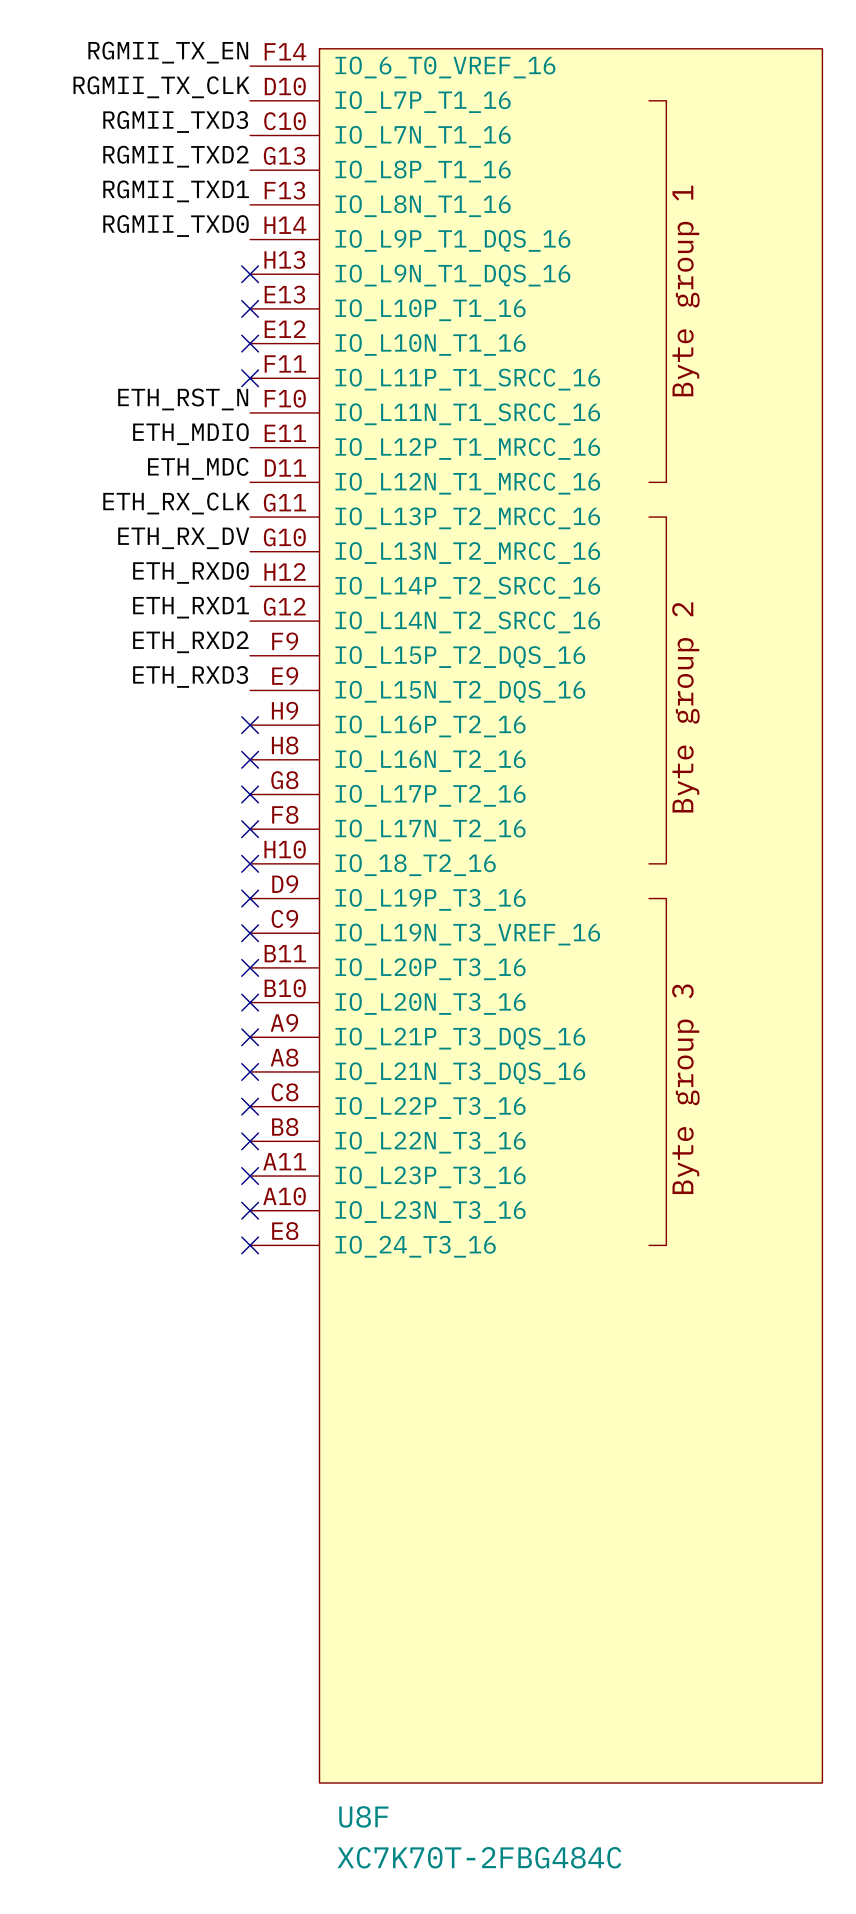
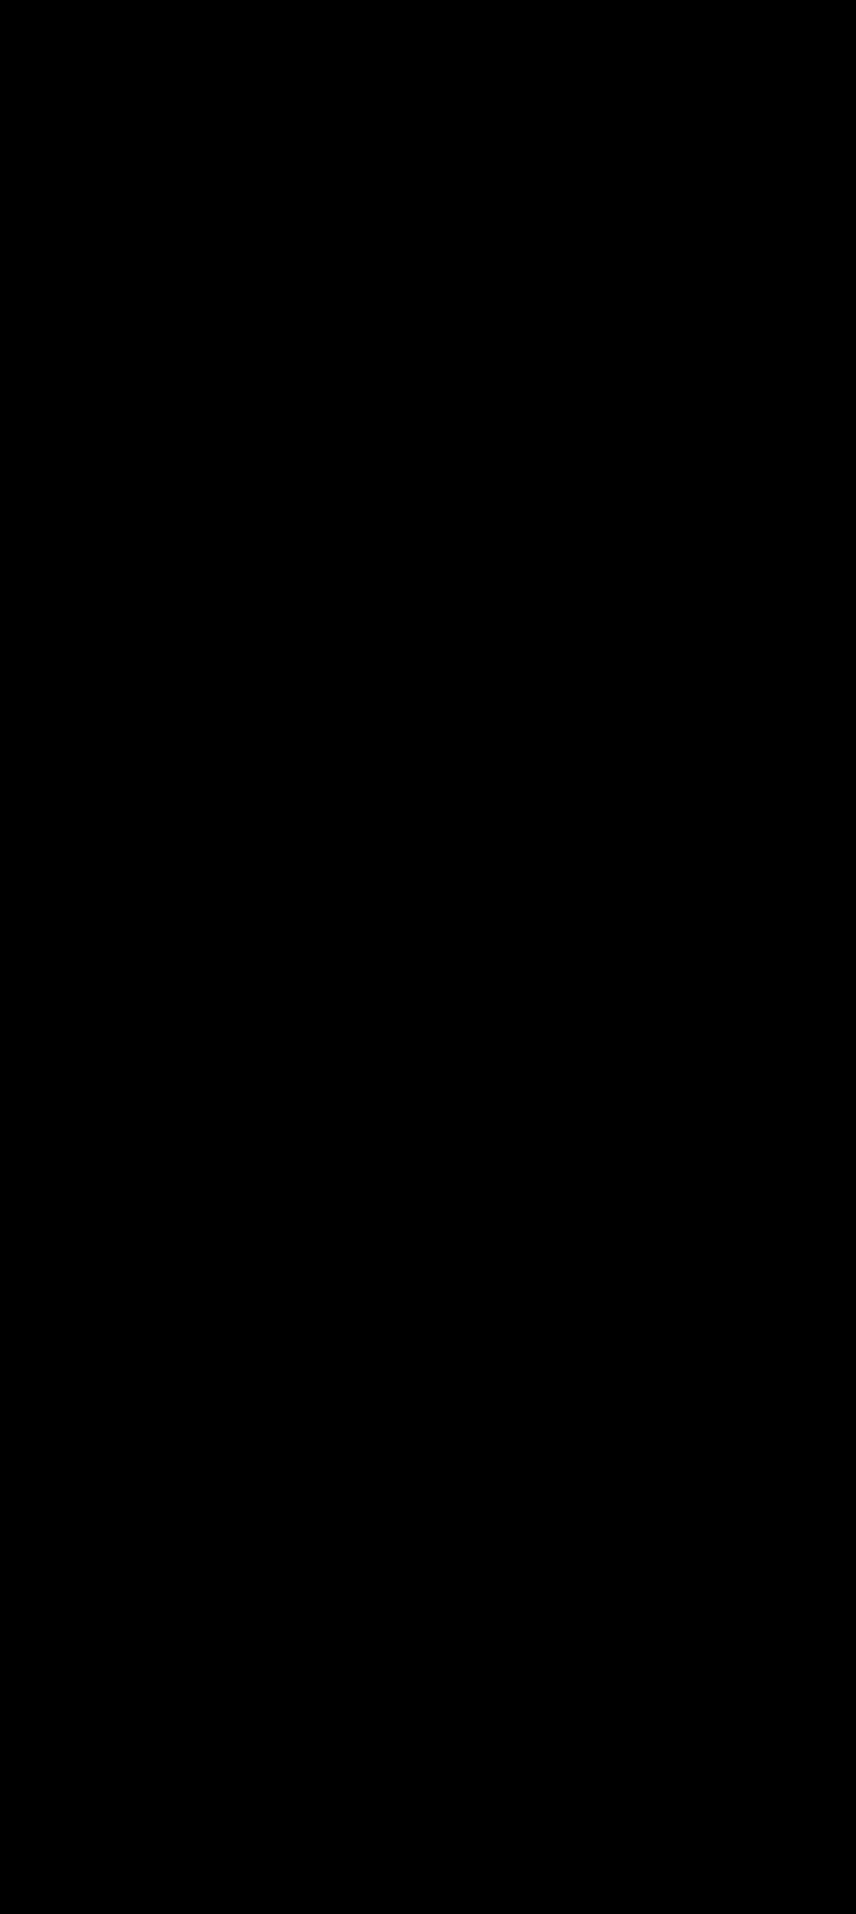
label: RGMII_TX_EN (168, 52) -> none
label: RGMII_TX_CLK (161, 87) -> none
label: RGMII_TXD3 (175, 121) -> none
label: RGMII_TXD2 (175, 156) -> none
label: RGMII_TXD1 (176, 191) -> none
label: RGMII_TXD0 (176, 226) -> none
no-connect mark: (250, 274) -> none
no-connect mark: (250, 308) -> none
no-connect mark: (250, 343) -> none
no-connect mark: (250, 378) -> none
label: ETH_RST_N (183, 399) -> none
label: ETH_MDIO (190, 434) -> none
label: ETH_MDC (198, 468) -> none
label: ETH_RX_CLK (176, 503) -> none
label: ETH_RX_DV (183, 538) -> none
label: ETH_RXD0 (190, 572) -> none
label: ETH_RXD1 (191, 607) -> none
label: ETH_RXD2 (190, 642) -> none
label: ETH_RXD3 (190, 676) -> none
no-connect mark: (250, 725) -> none
no-connect mark: (250, 759) -> none
no-connect mark: (250, 794) -> none
no-connect mark: (250, 829) -> none
no-connect mark: (250, 863) -> none
no-connect mark: (250, 898) -> none
U8F: XC7K70T-2FBG484C (536, 915) -> none
no-connect mark: (250, 933) -> none
no-connect mark: (250, 967) -> none
no-connect mark: (250, 1002) -> none
no-connect mark: (250, 1037) -> none
no-connect mark: (250, 1071) -> none
no-connect mark: (250, 1106) -> none
no-connect mark: (250, 1141) -> none
no-connect mark: (250, 1176) -> none
no-connect mark: (250, 1210) -> none
no-connect mark: (250, 1245) -> none

